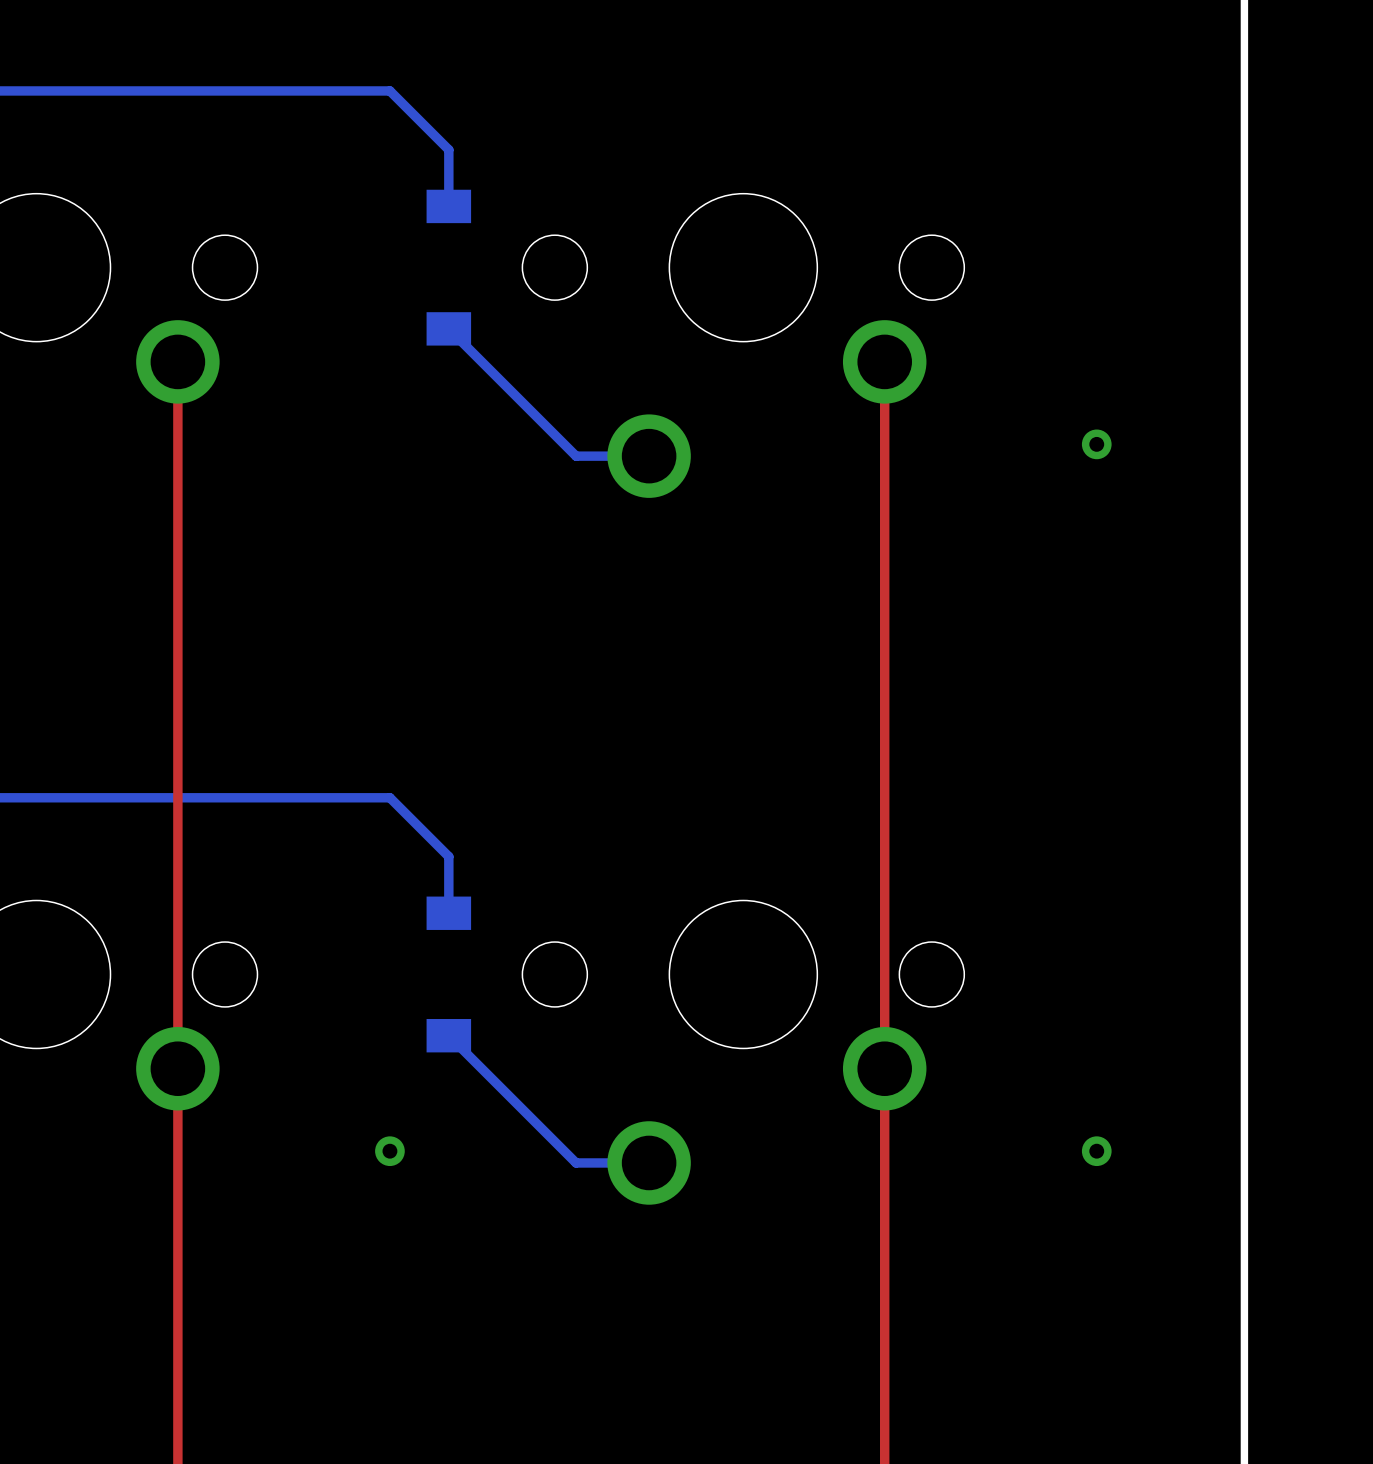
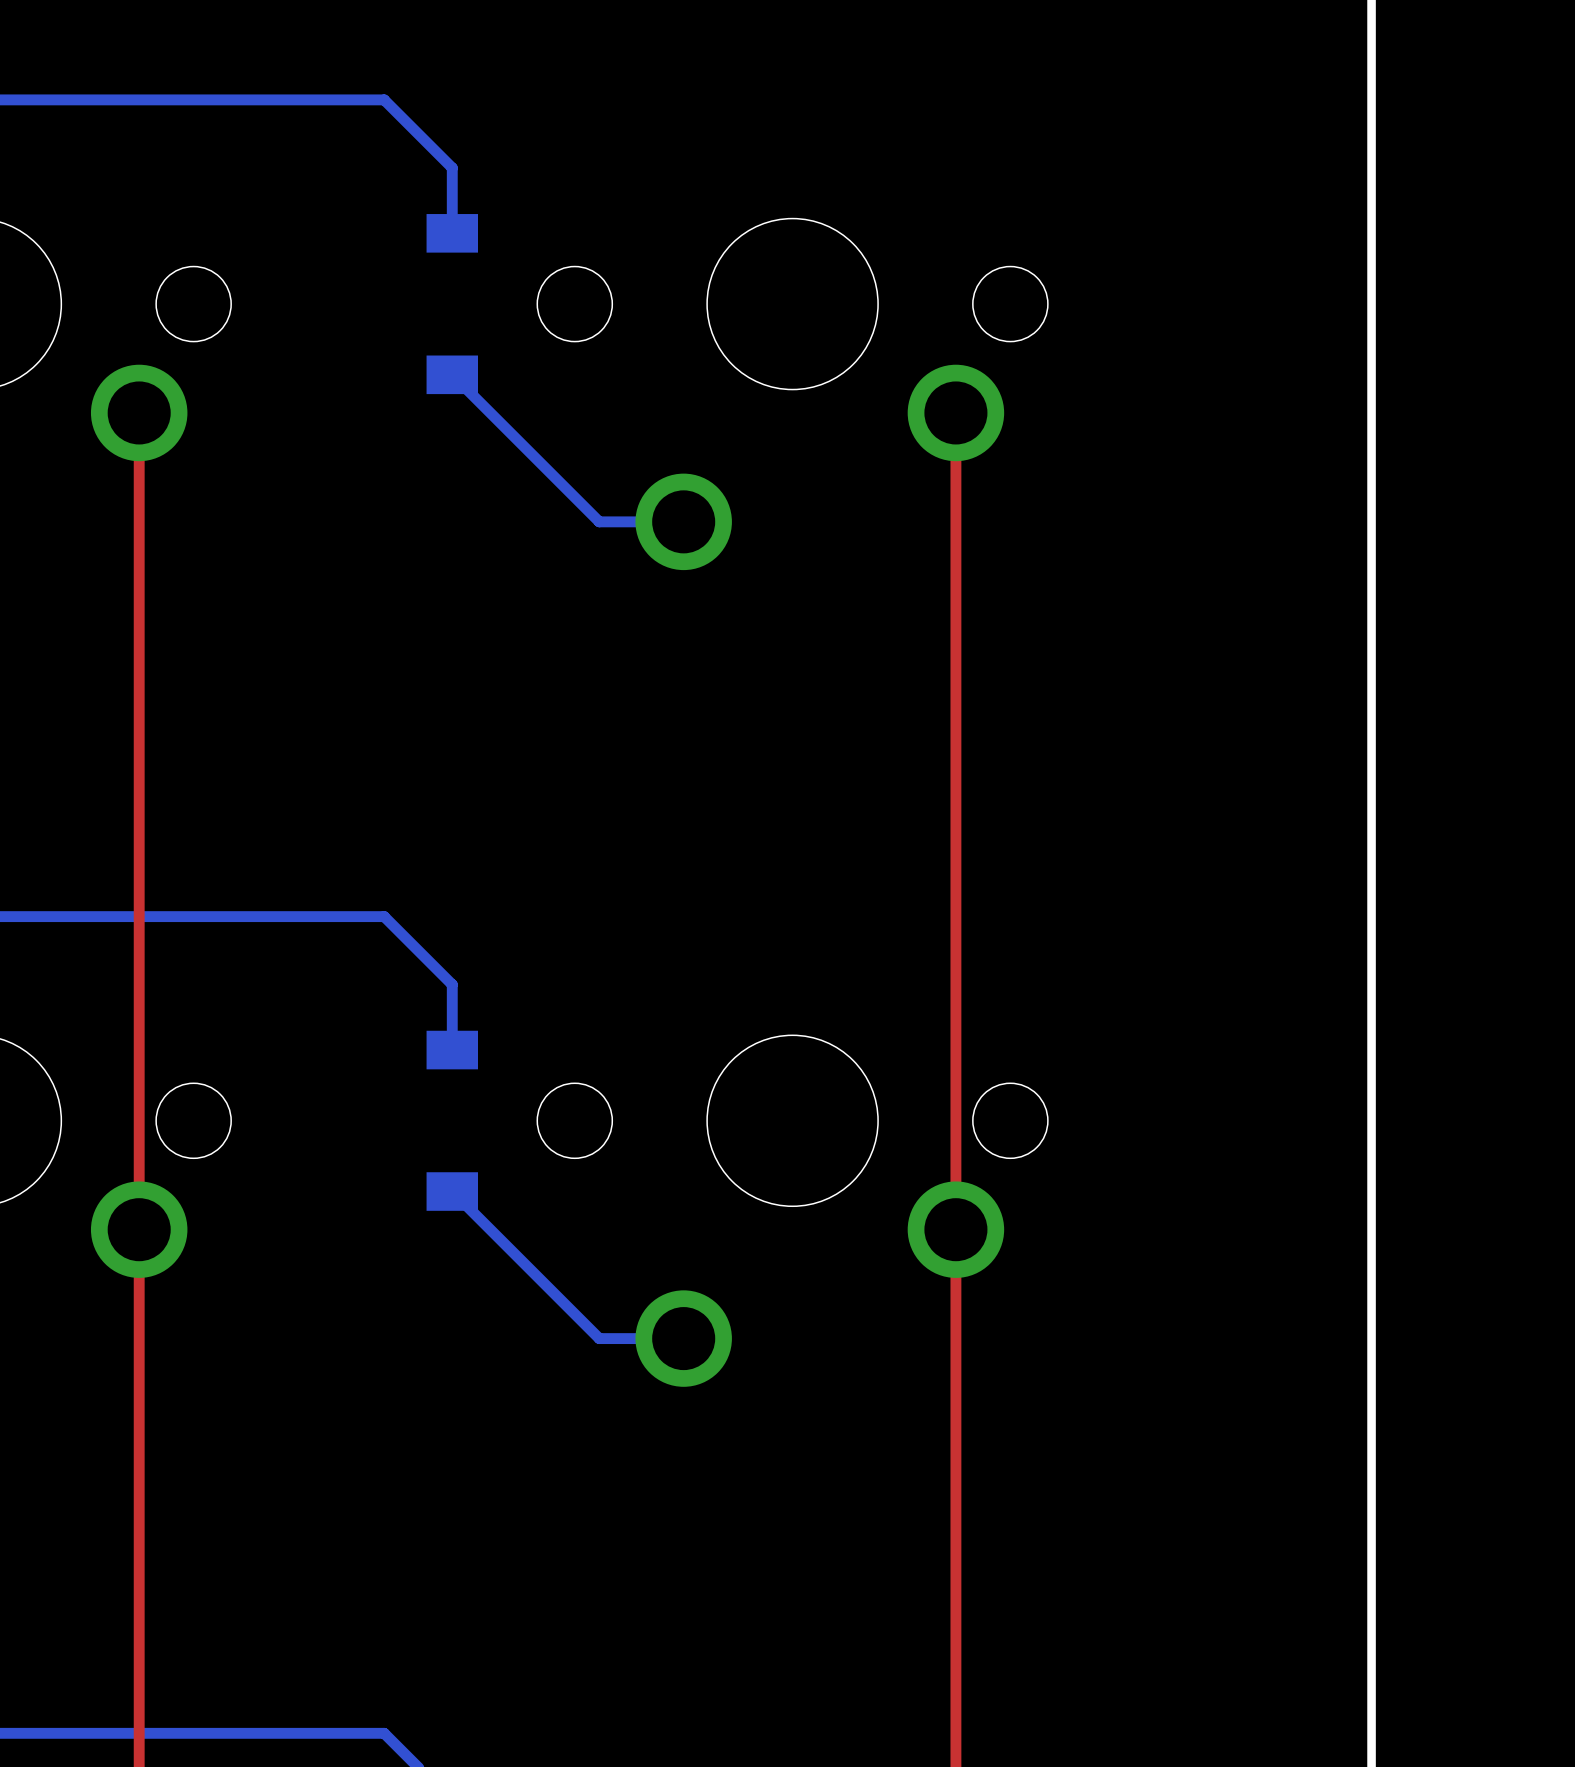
via: (1096, 444) -> none
via: (389, 1151) -> none
via: (1096, 1151) -> none

